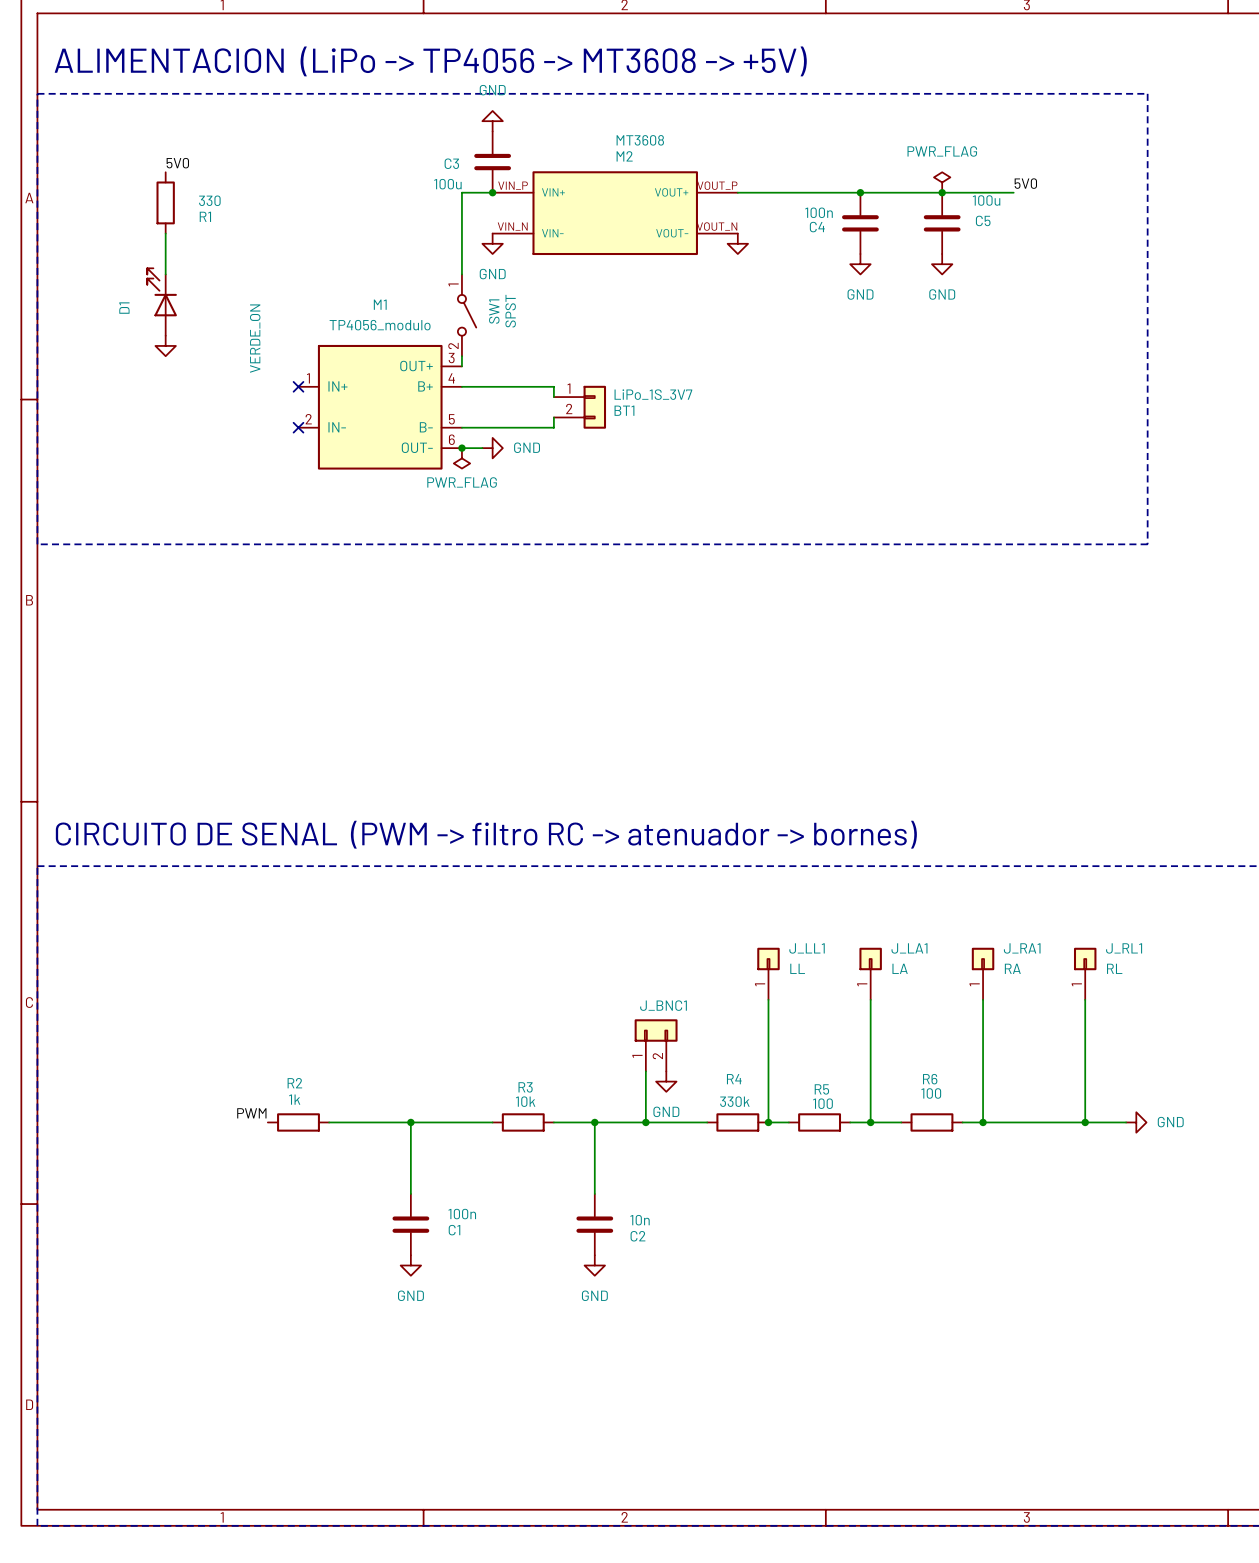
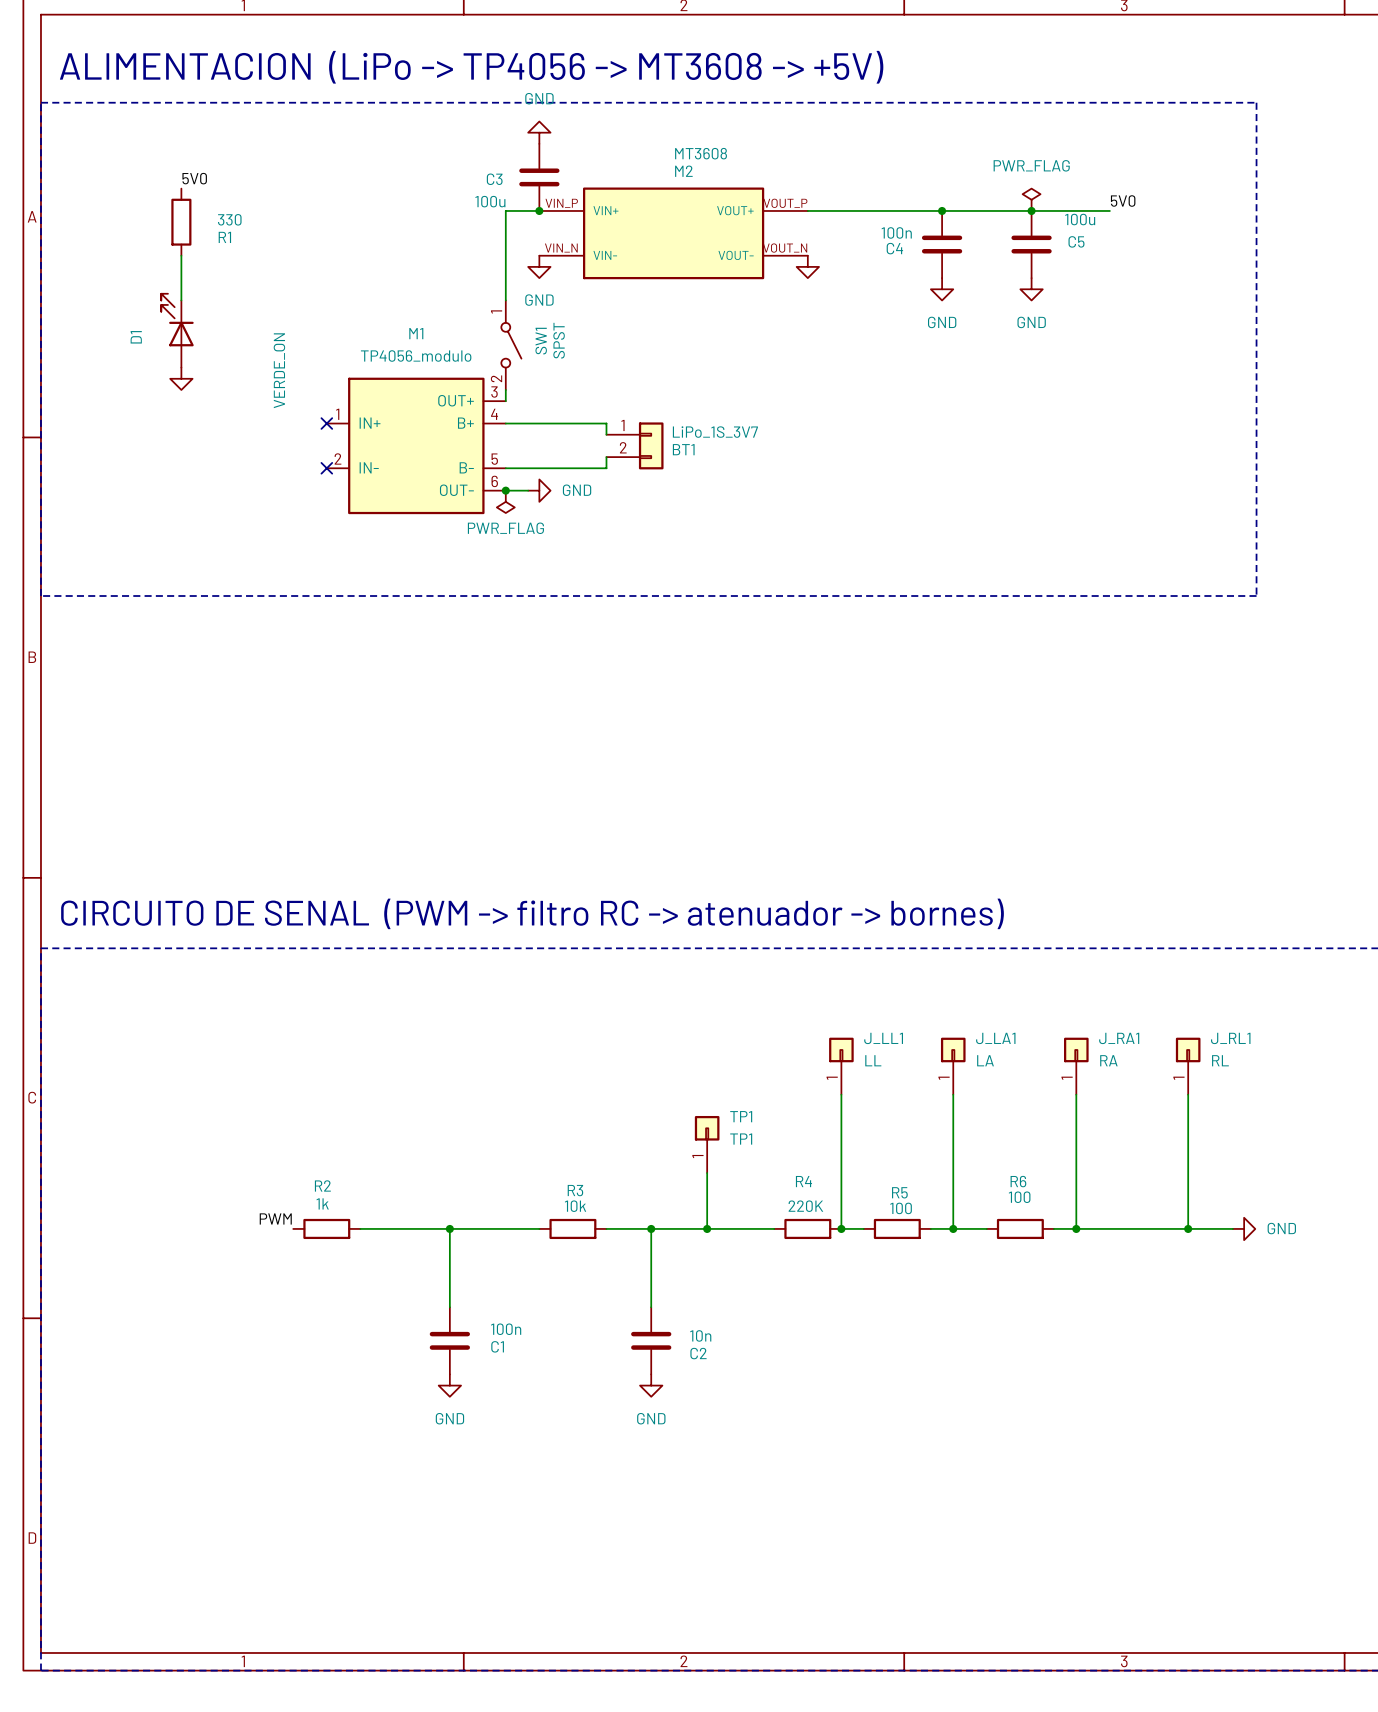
TP1: none -> TP1 (707, 1144)
J_BNC1: (656, 1045) -> none
power symbol: GND (666, 1081) -> none
R4 value: 330k (734, 1101) -> 220K (805, 1206)

